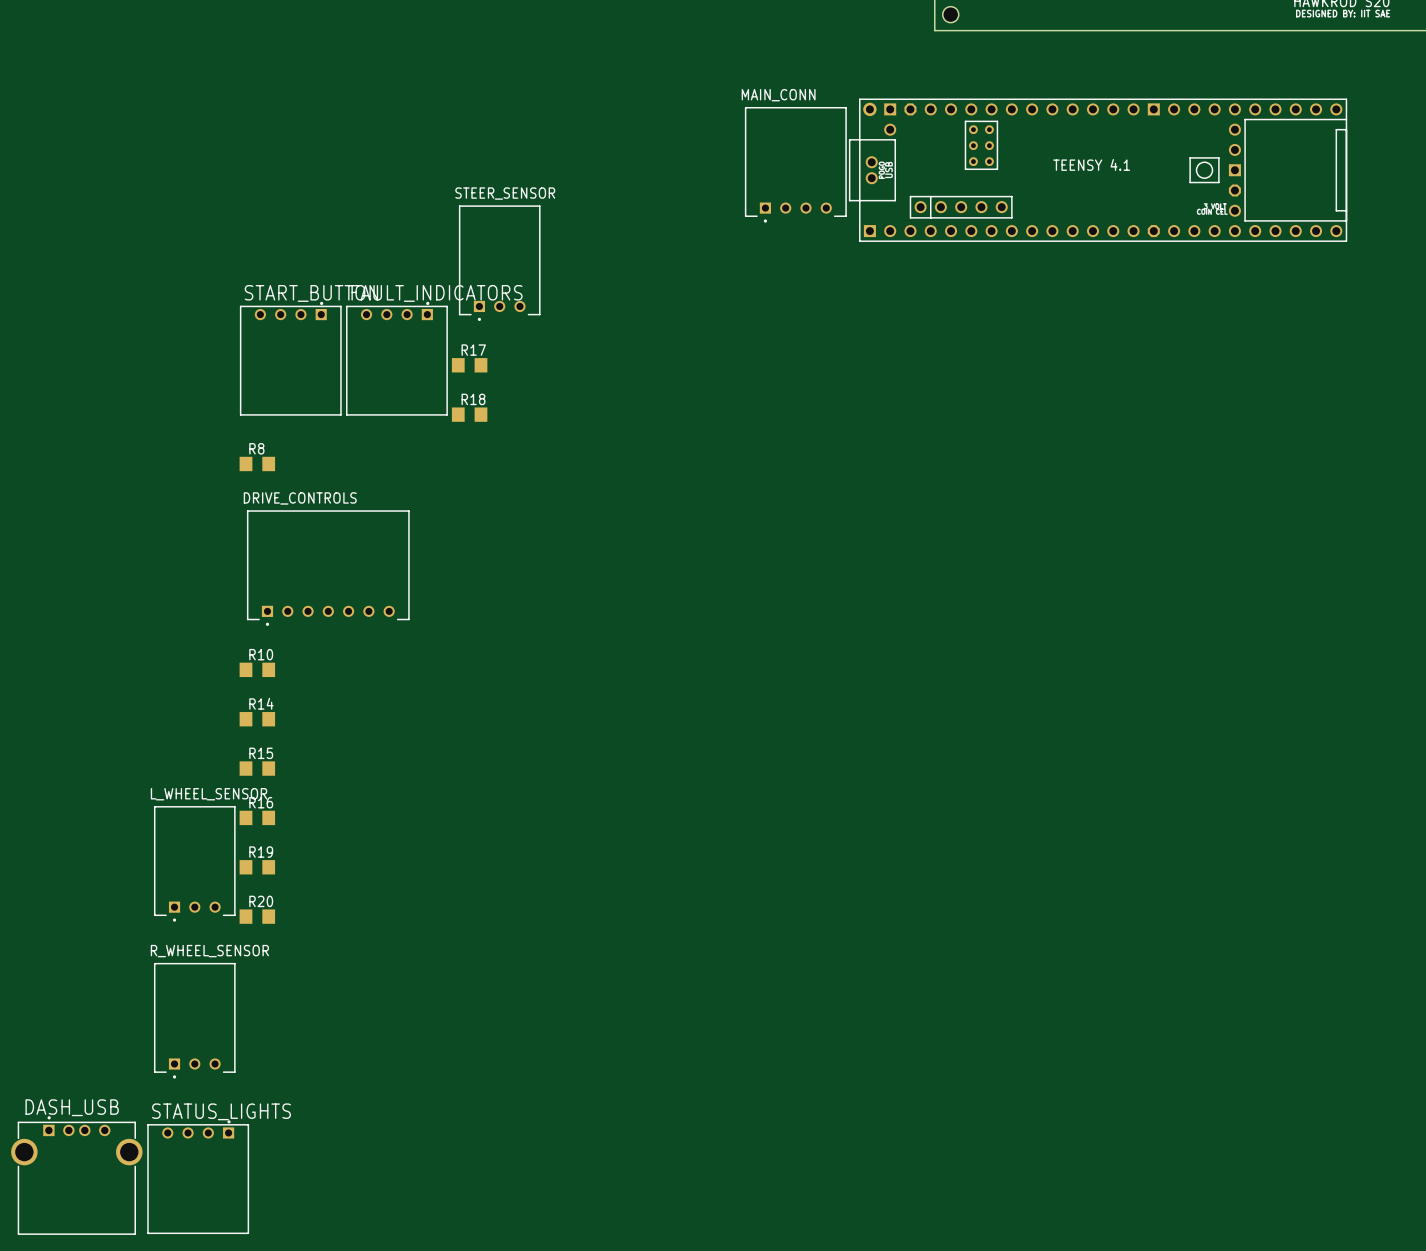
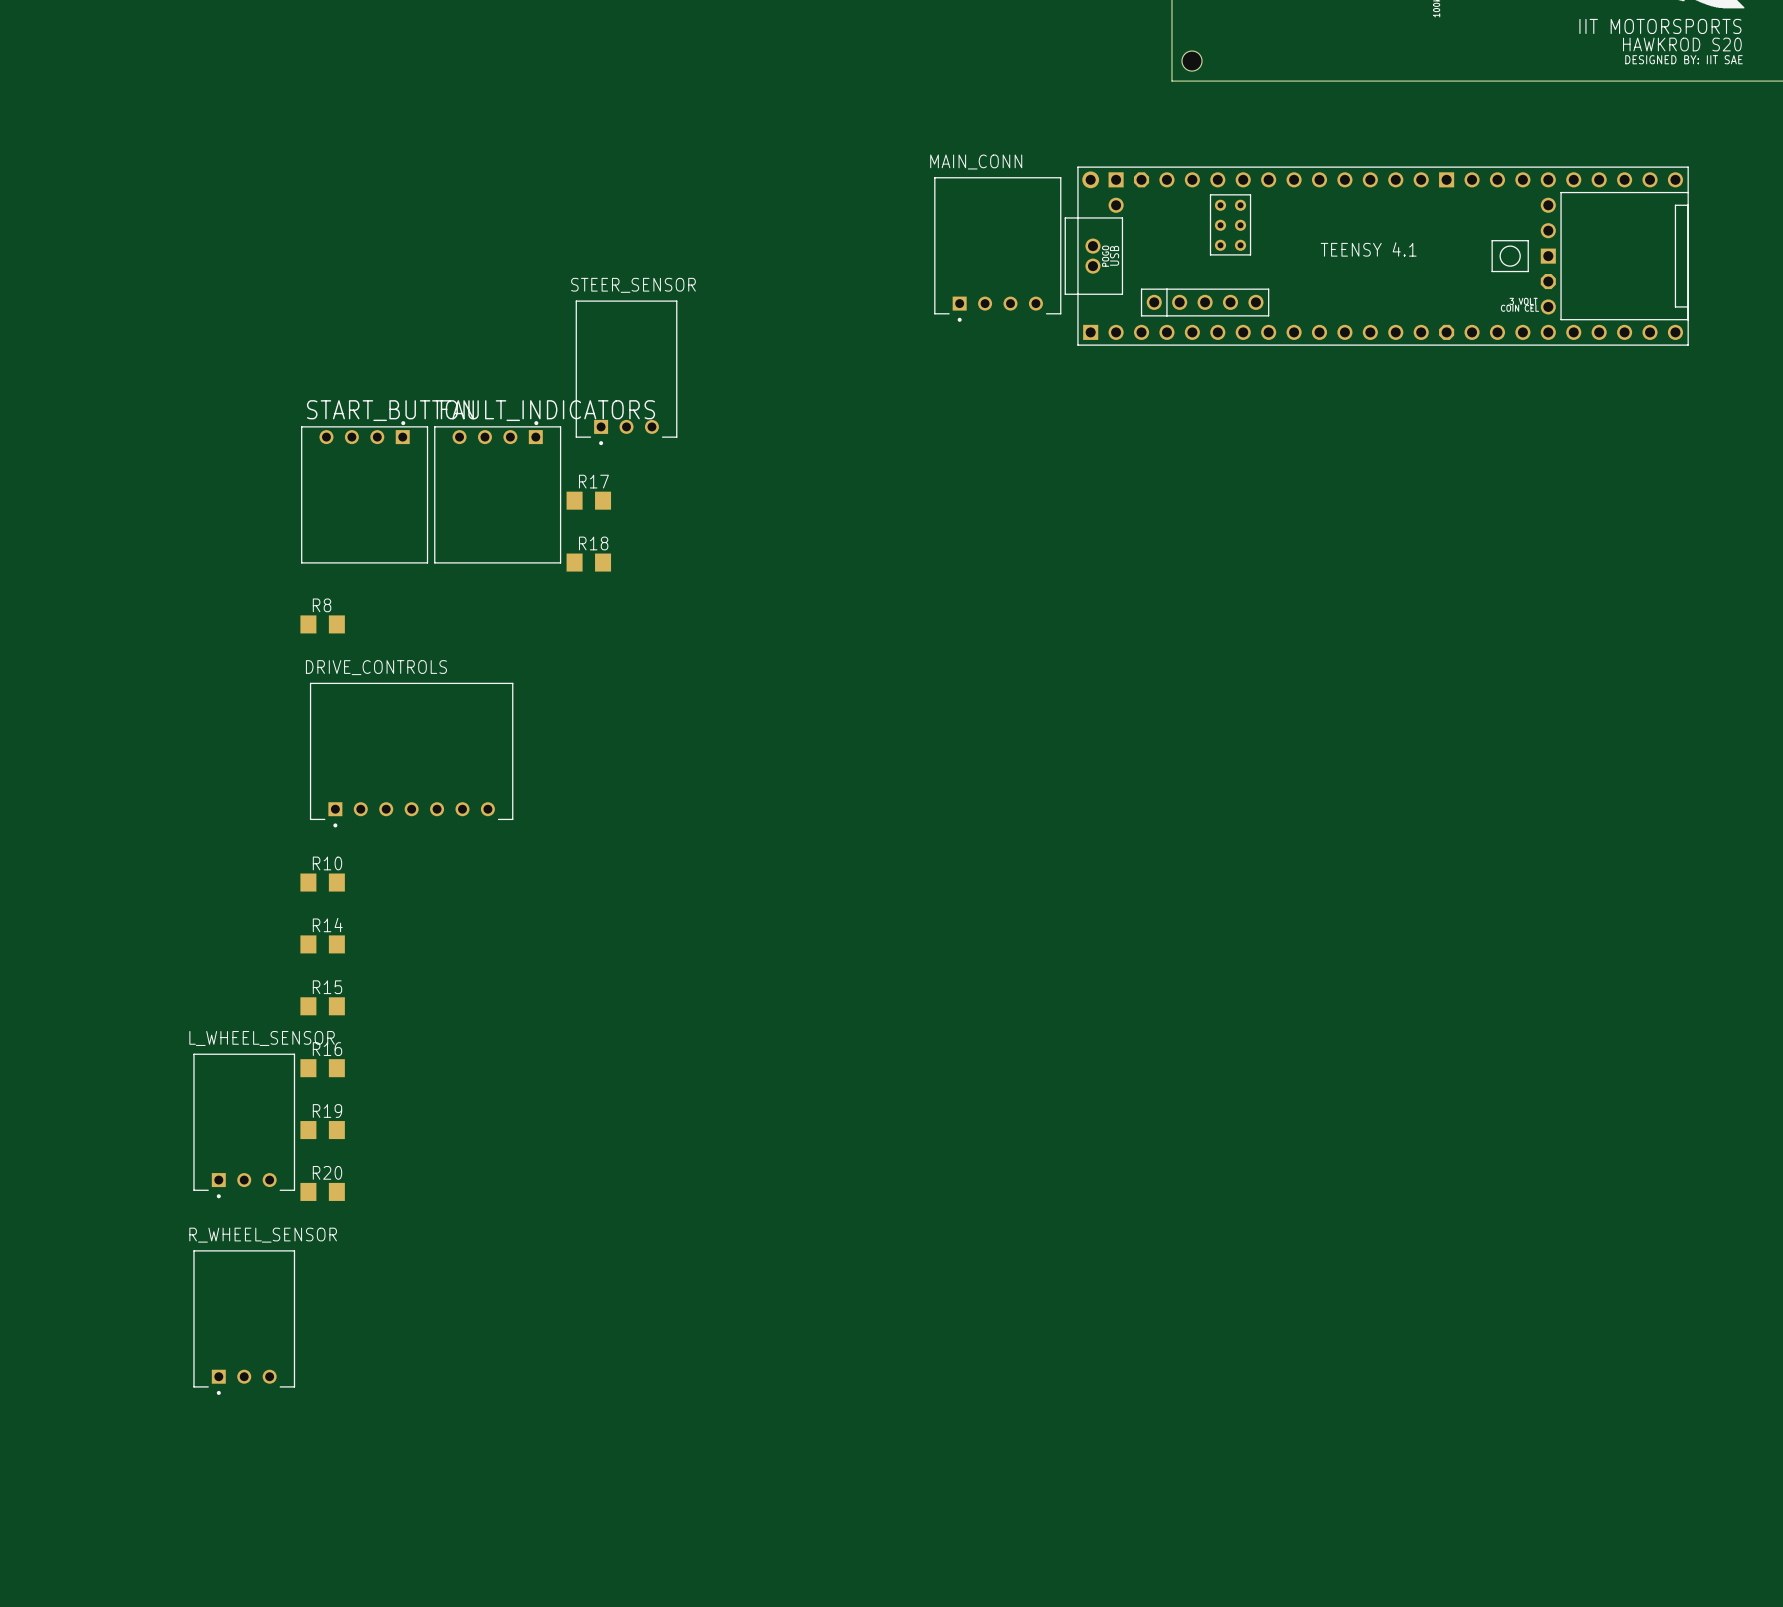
DASH_USB: (76, 1175) -> none
STATUS_LIGHTS: (198, 1177) -> none

